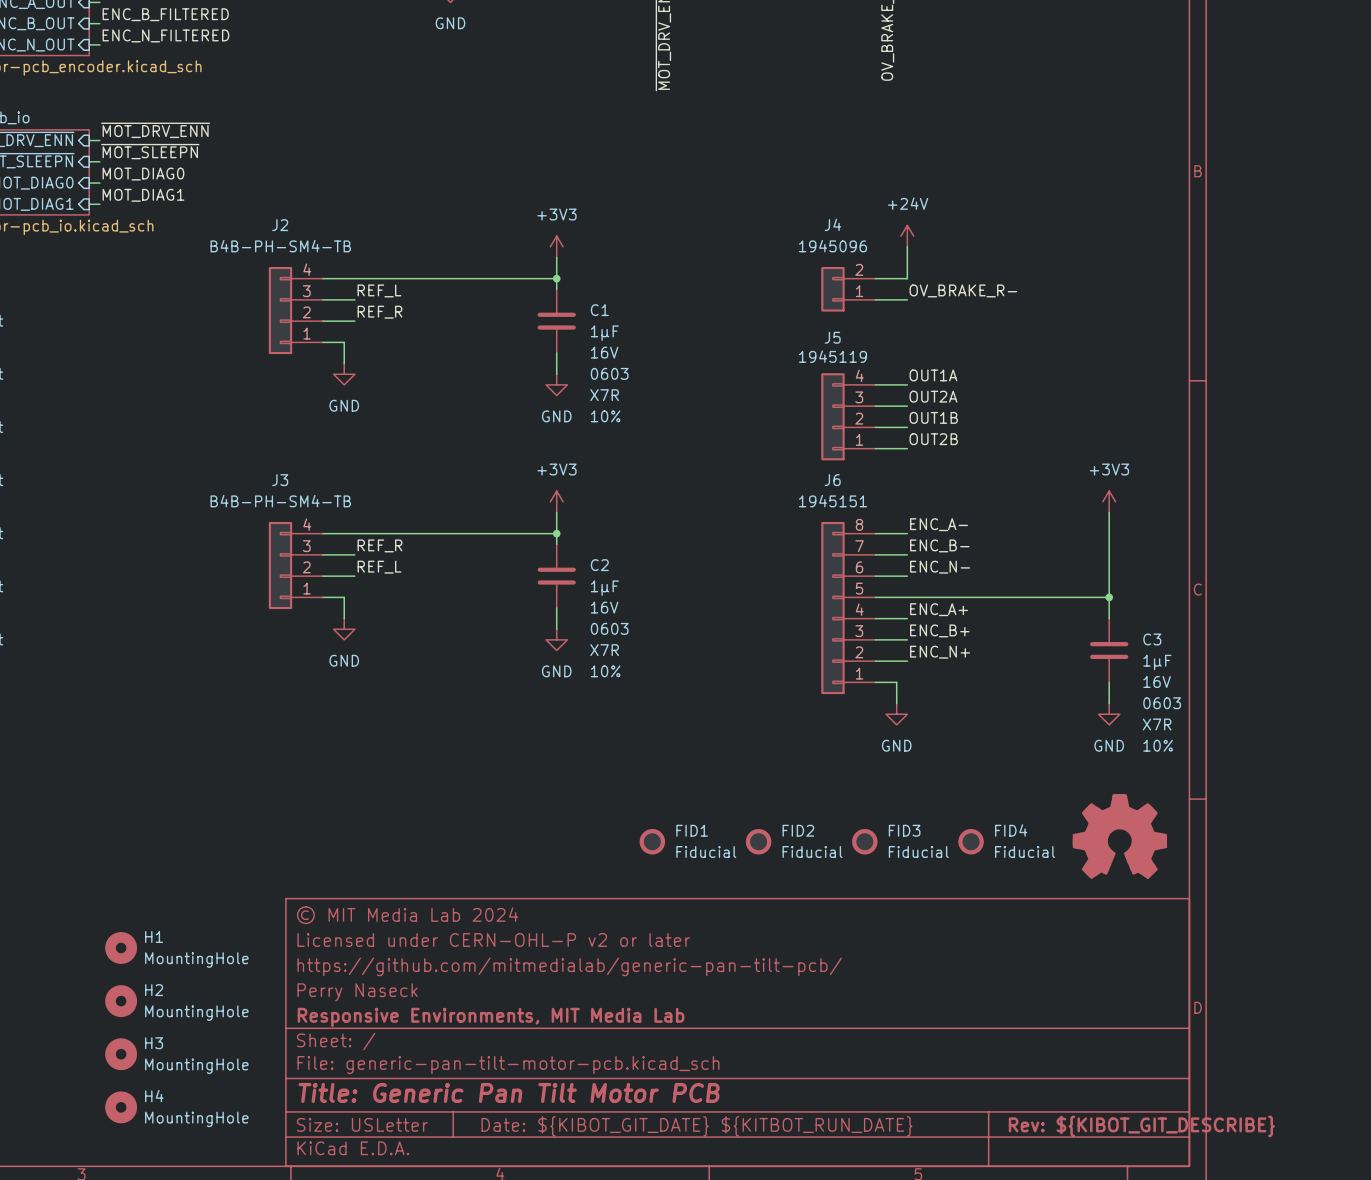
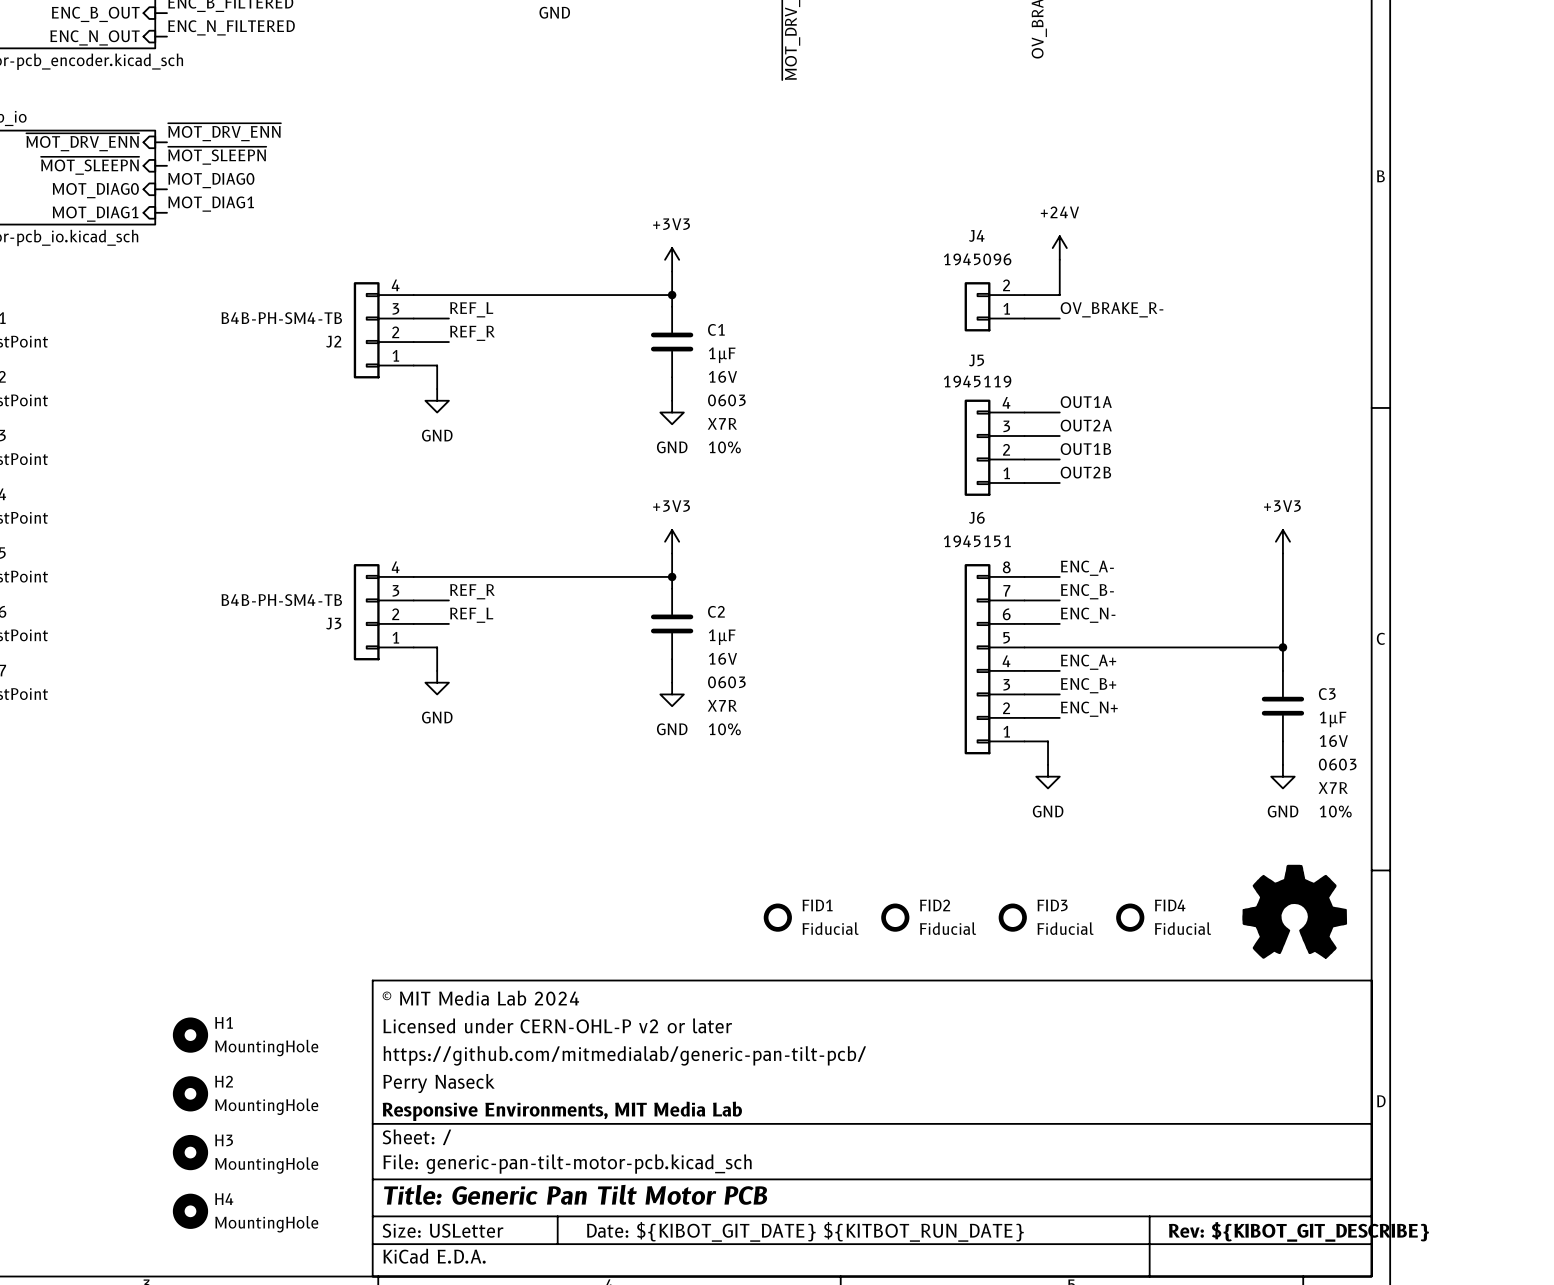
J2 name position: J2 (280, 225) -> J2 (333, 341)
J2 value position: B4B-PH-SM4-TB (280, 246) -> B4B-PH-SM4-TB (281, 318)
J3 name position: J3 (280, 480) -> J3 (333, 623)
J3 value position: B4B-PH-SM4-TB (280, 501) -> B4B-PH-SM4-TB (281, 600)

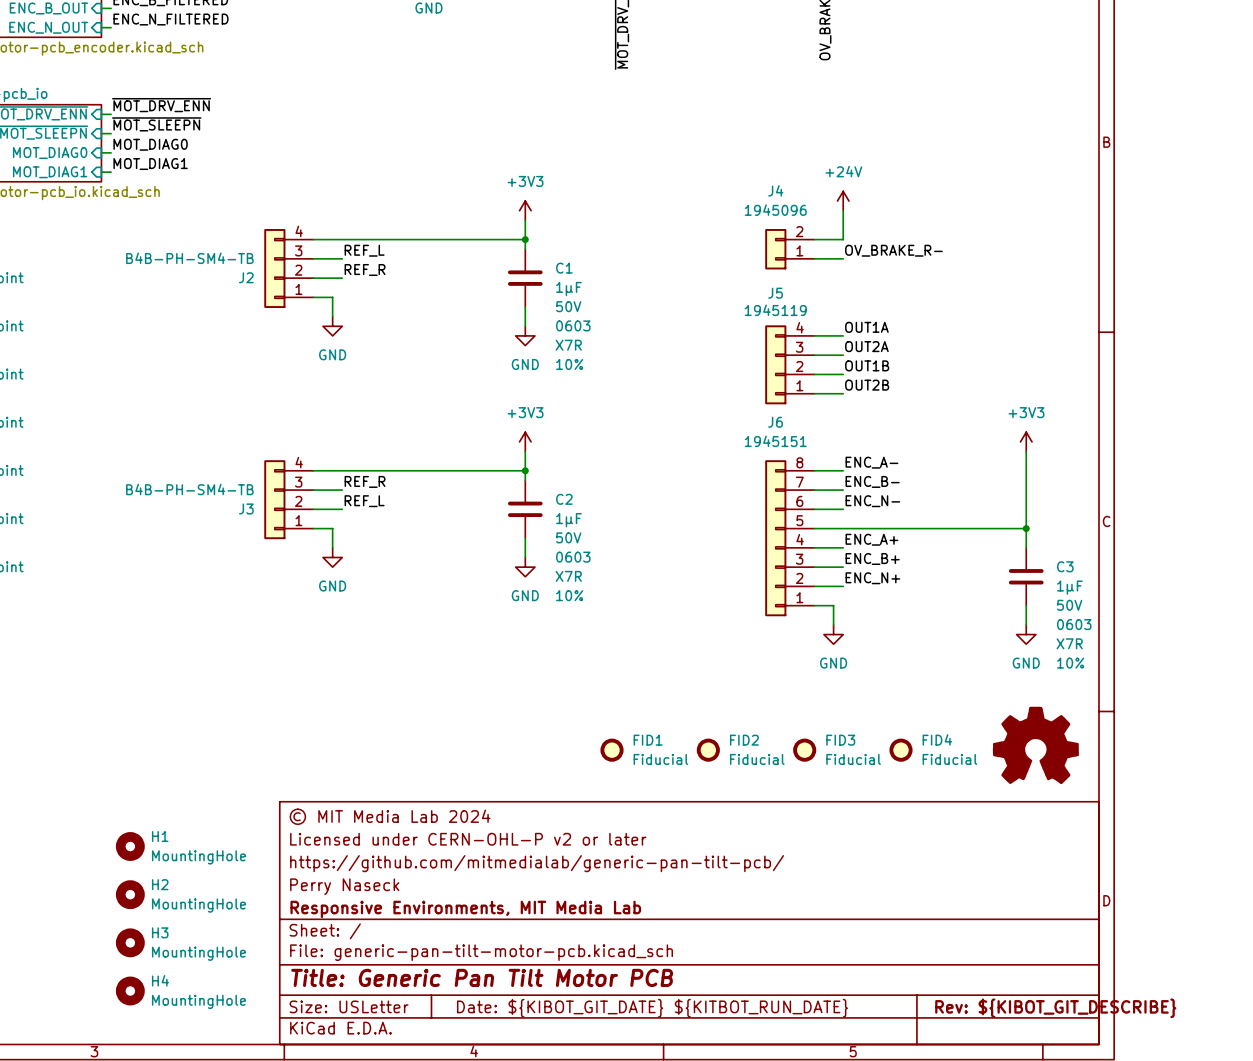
C1 text: 16V (722, 376) -> 50V (568, 306)
C2 text: 16V (722, 658) -> 50V (568, 537)
C3 text: 16V (1333, 741) -> 50V (1069, 605)

